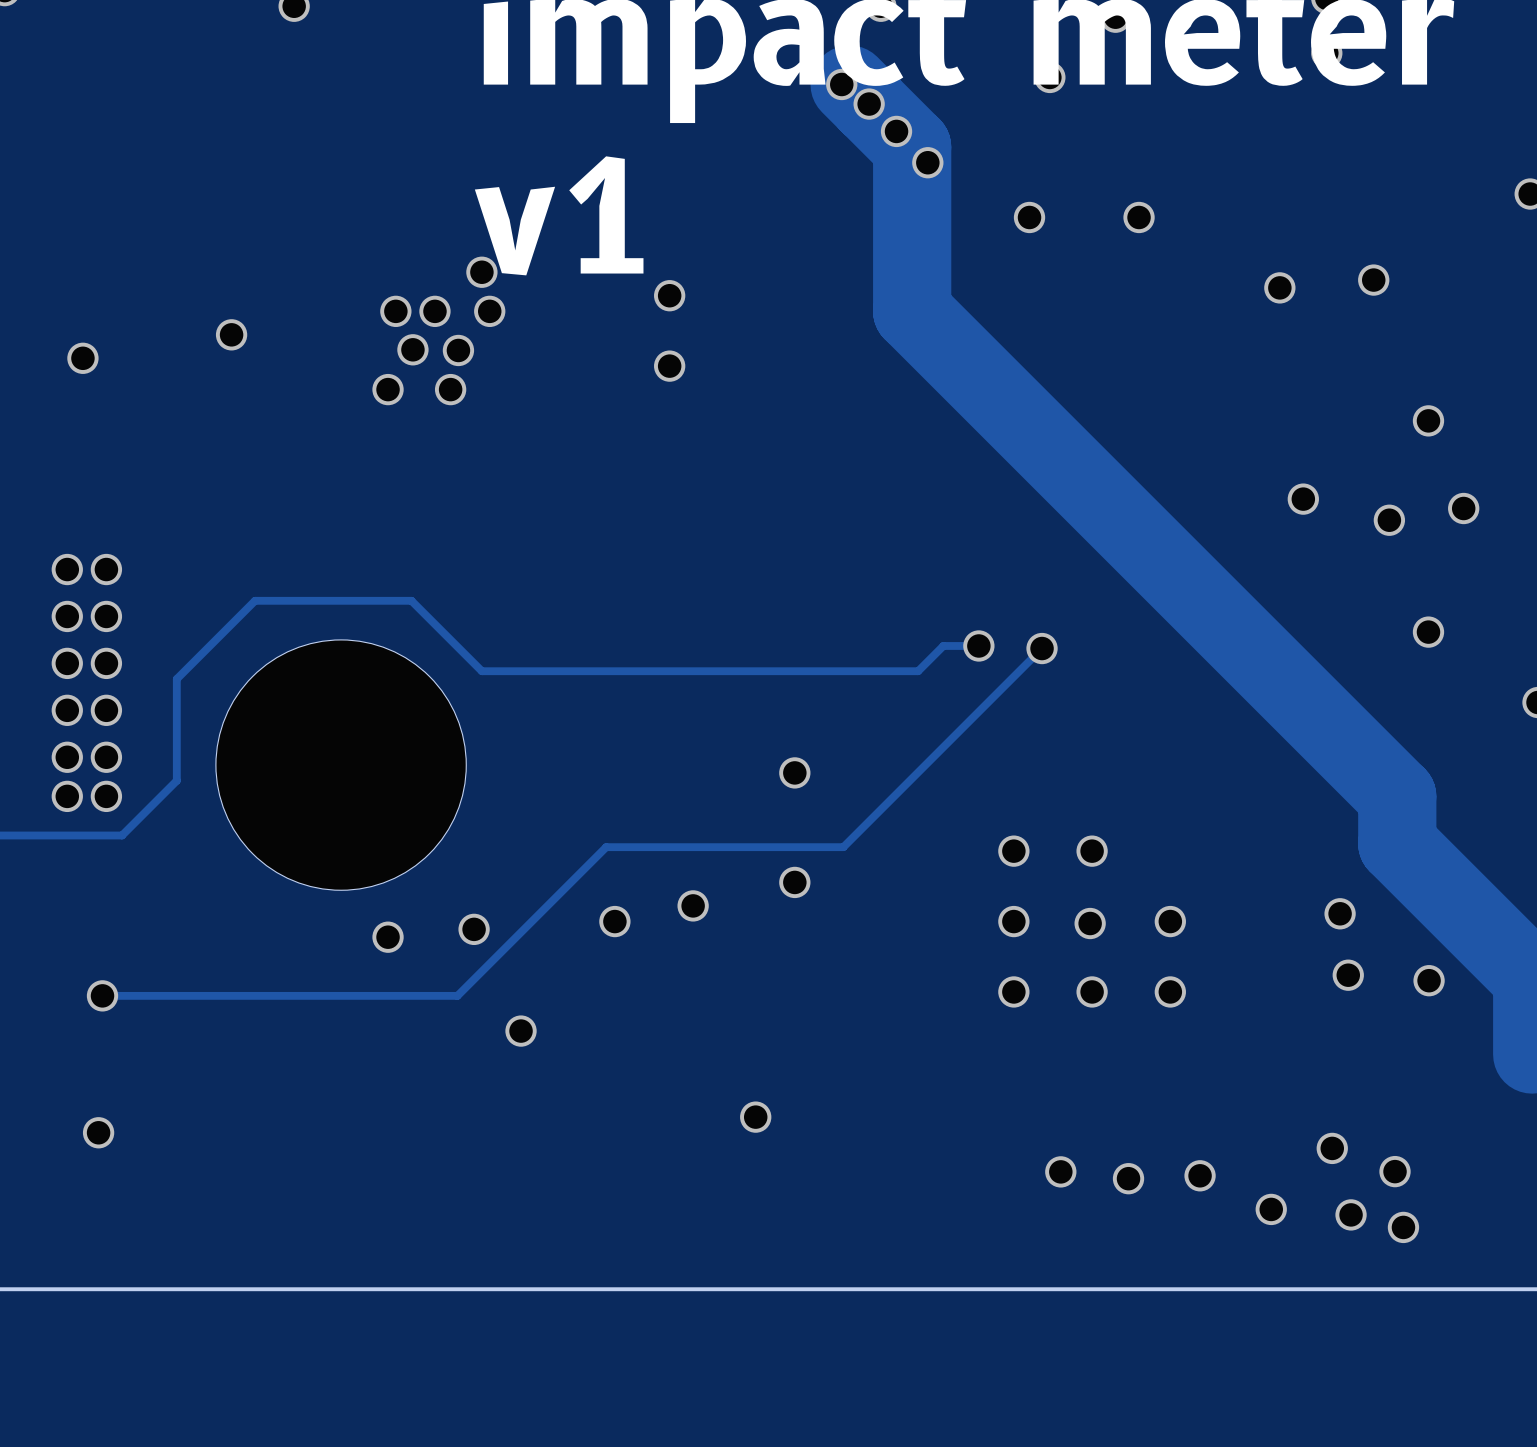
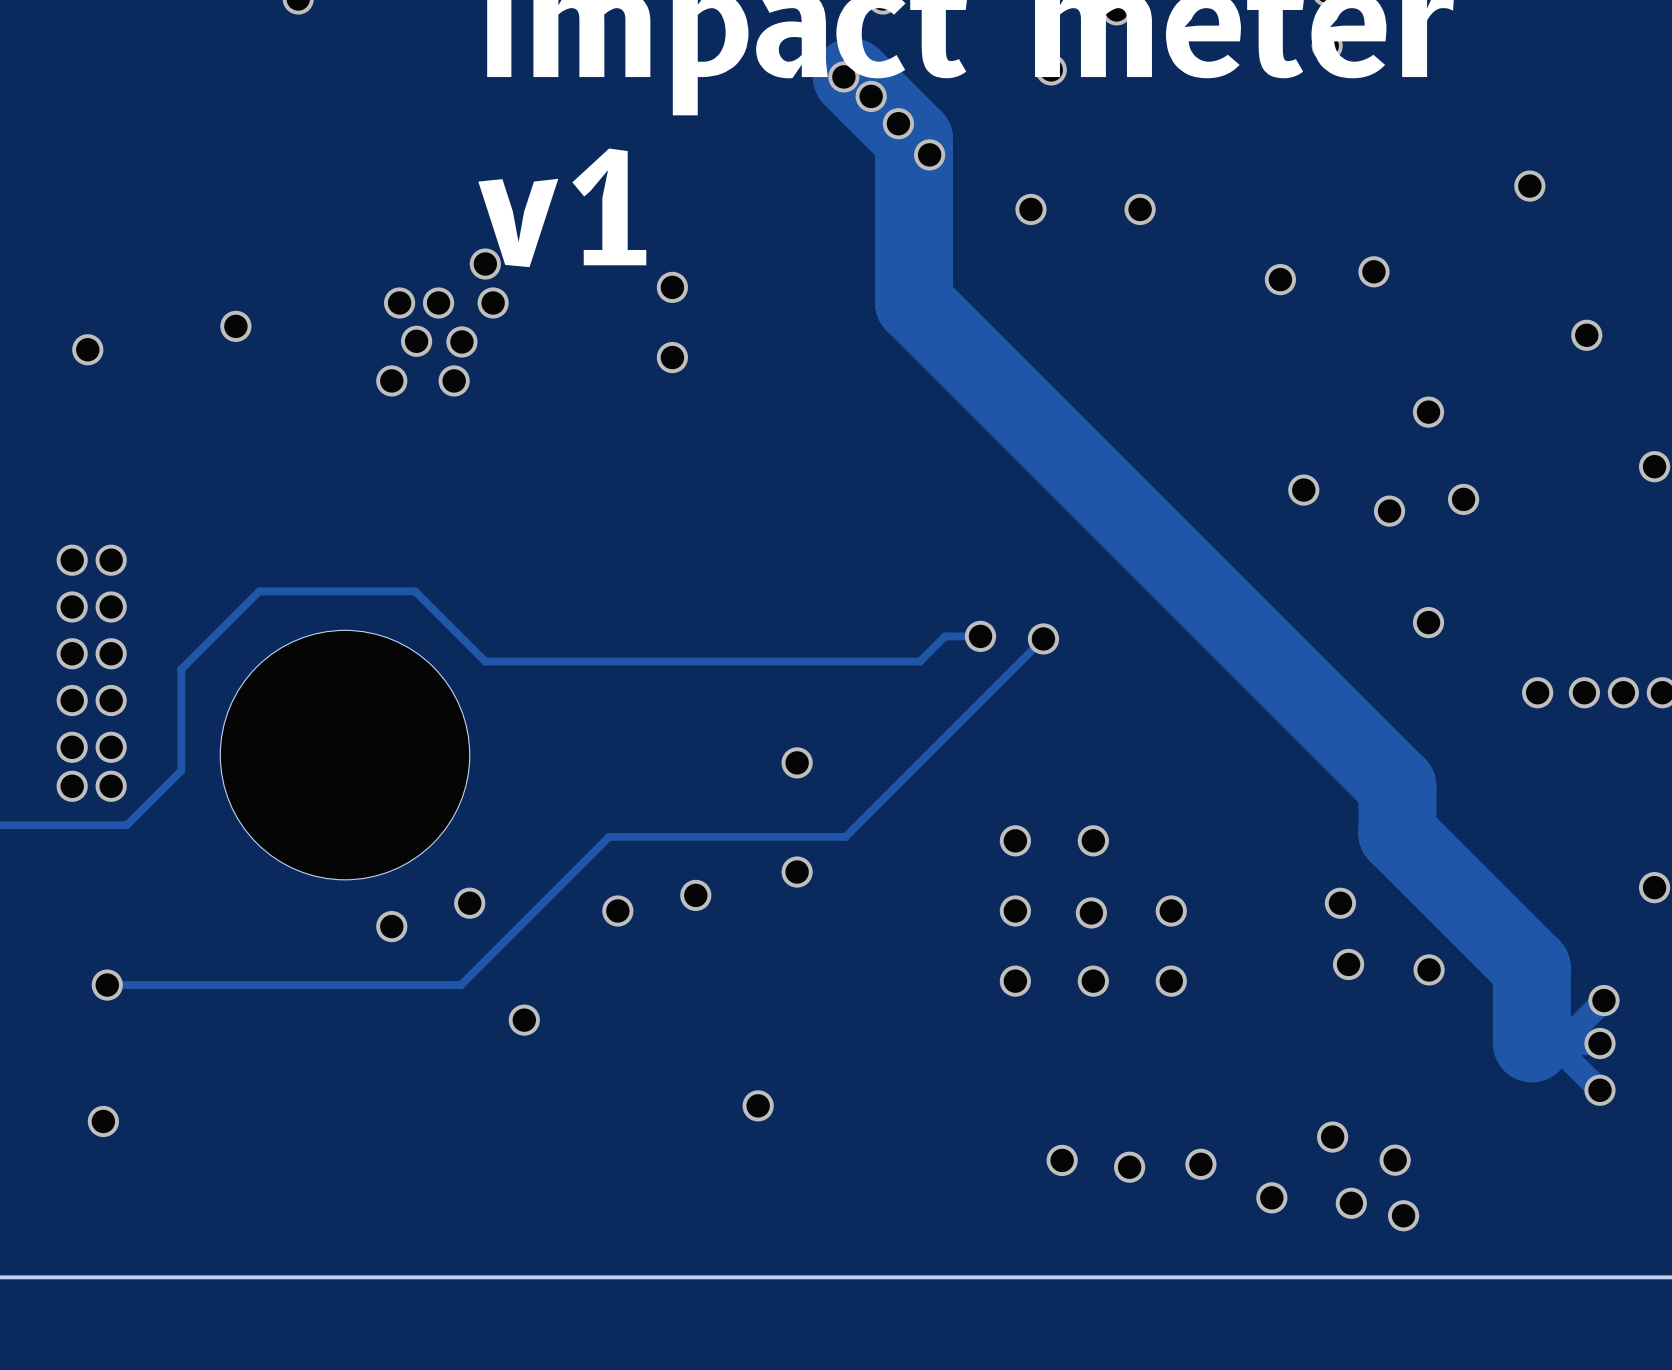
via position: (474, 929) -> (469, 903)

